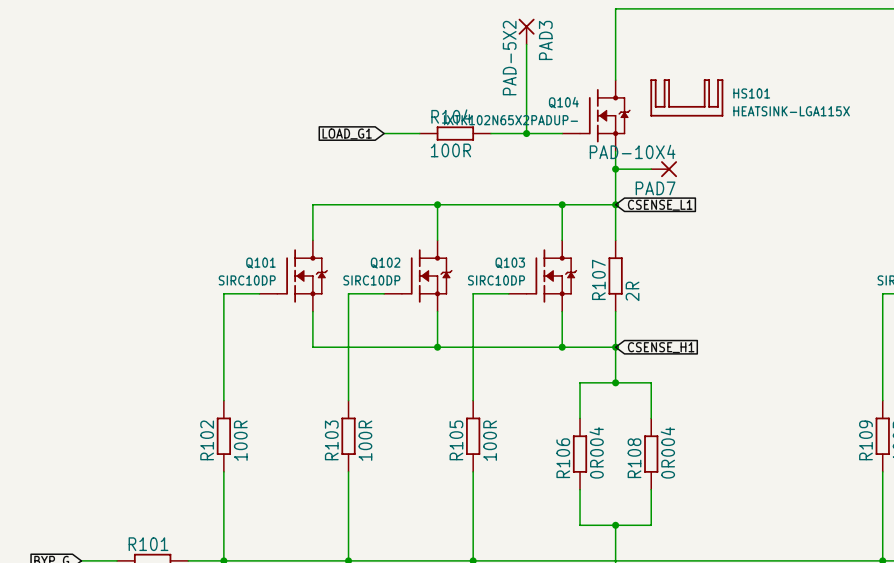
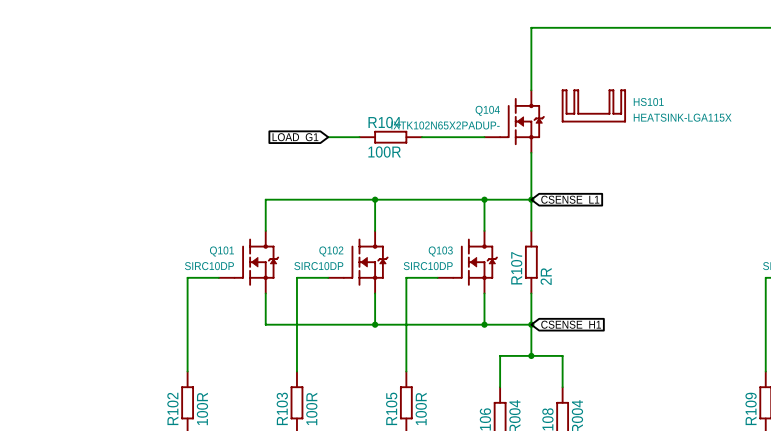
PAD3: PAD-5X2 (526, 31) -> none
wire: (526, 44) (526, 133) -> none
junction: (526, 133) -> none
wire: (615, 169) (651, 169) -> none
junction: (615, 169) -> none
PAD7: PAD-10X4 (664, 169) -> none

